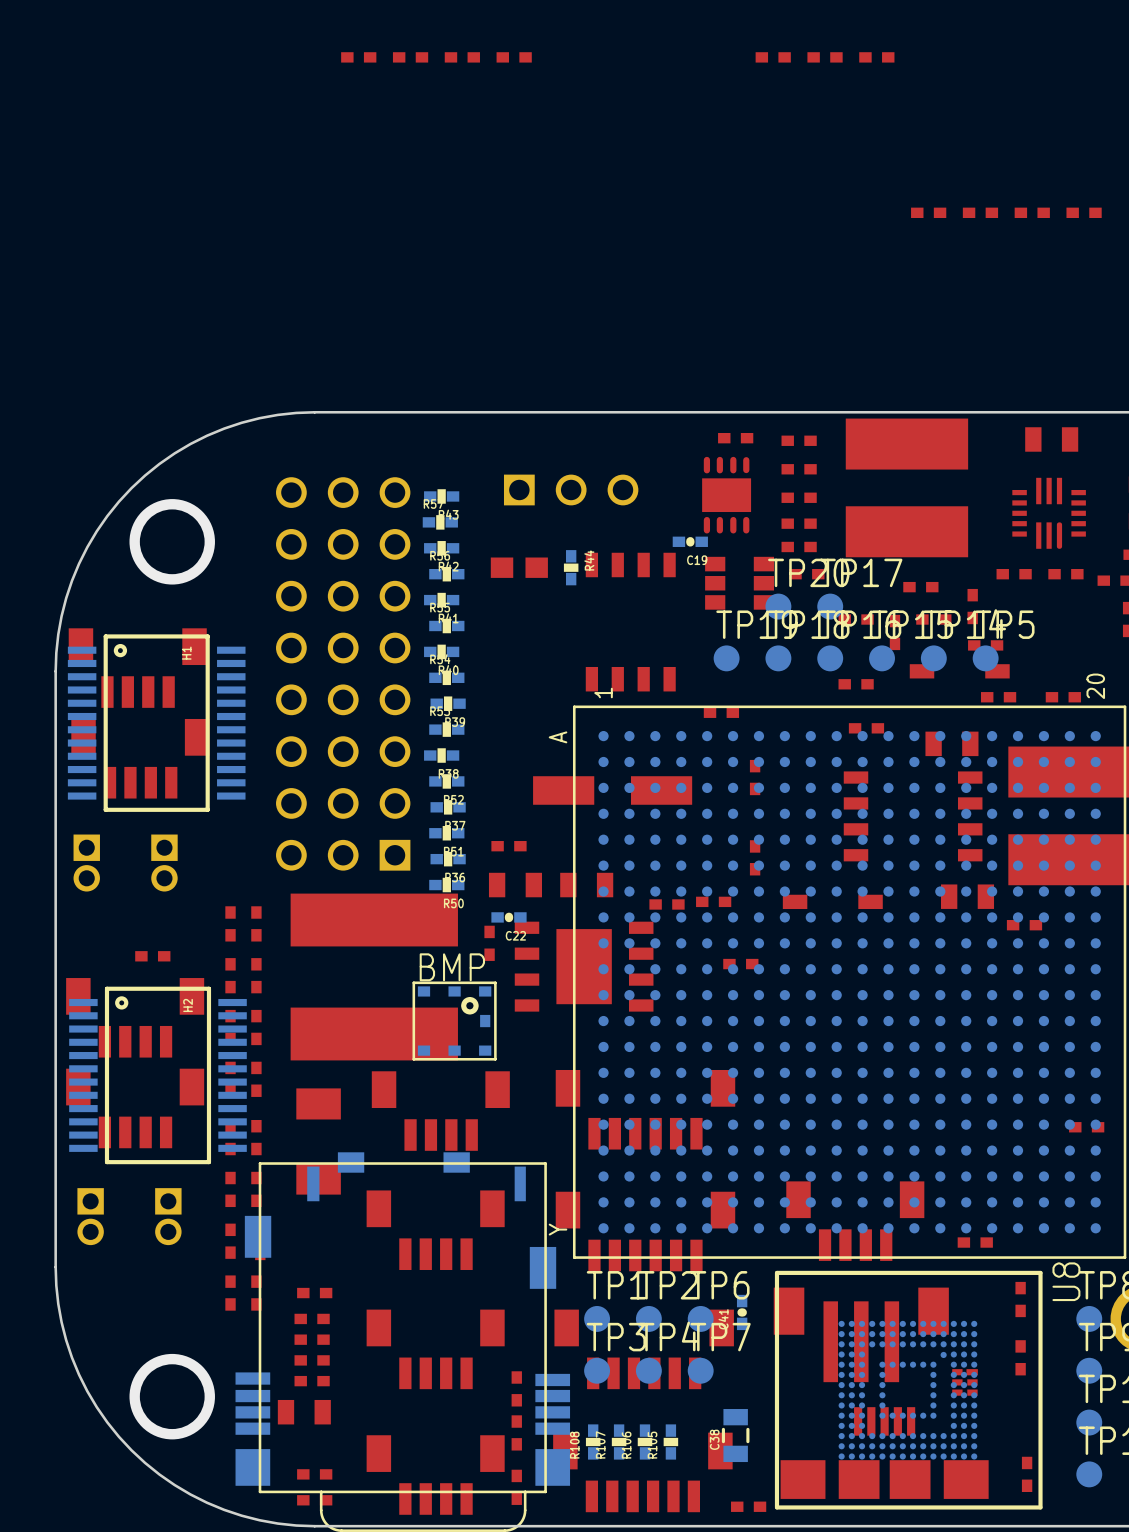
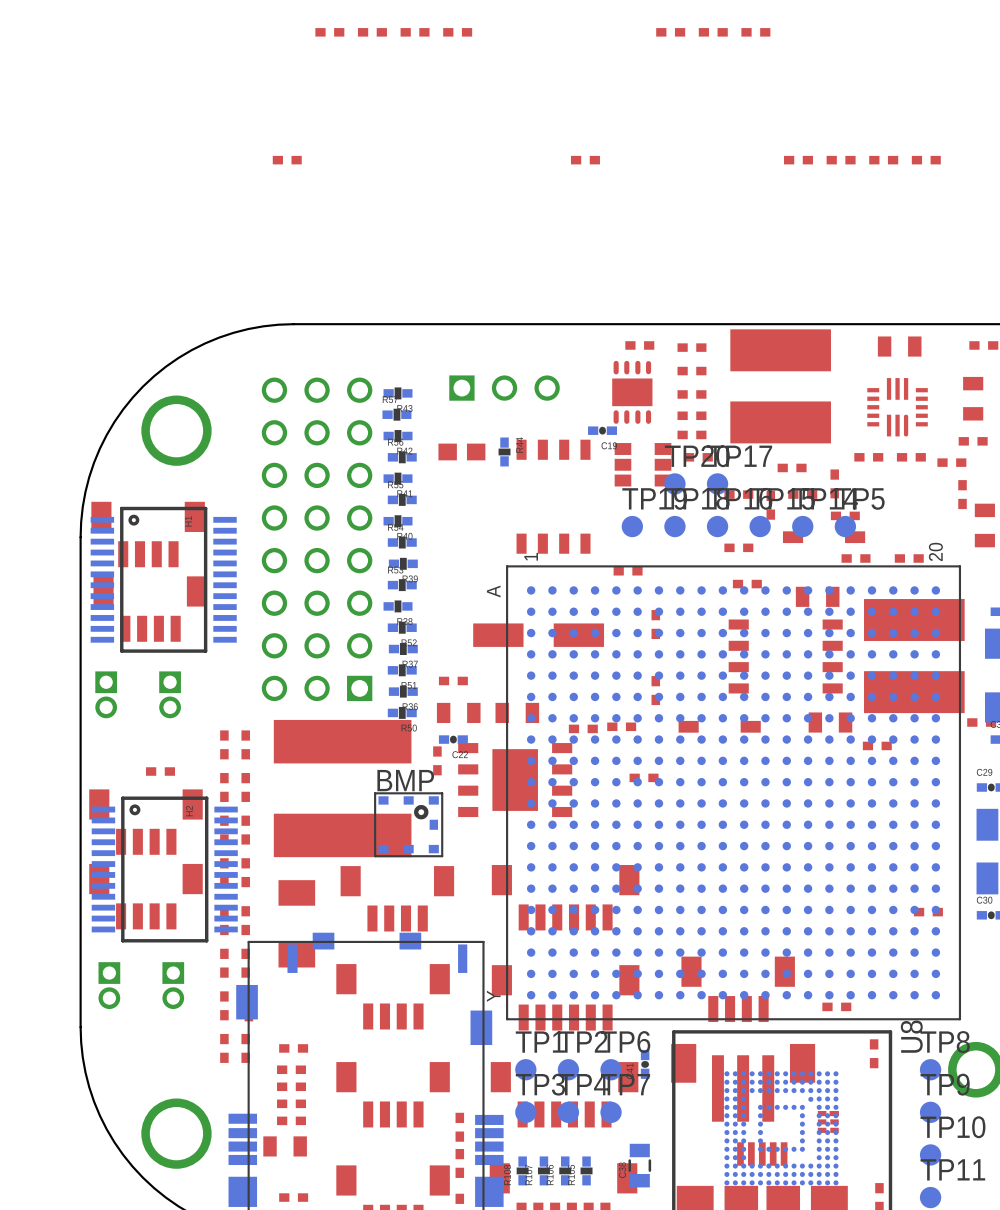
part: none -> (287, 160)
part: none -> (585, 160)
part: (1020, 1357) -> none

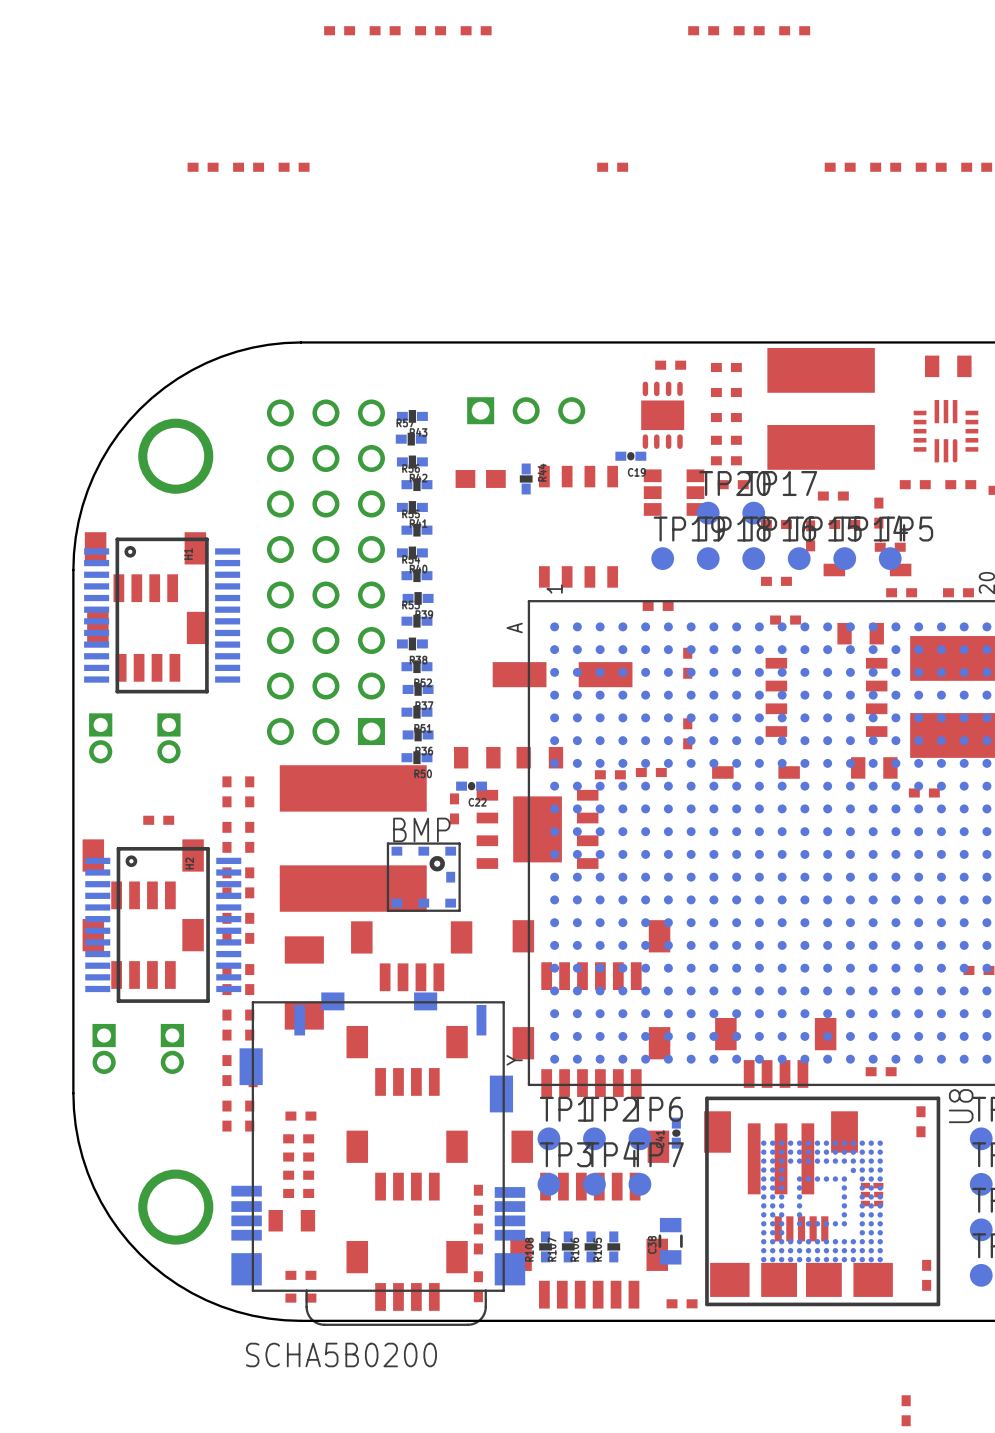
part: none -> (203, 167)
part: none -> (248, 167)
part: (453, 680) -> none
part: (644, 777) -> none

